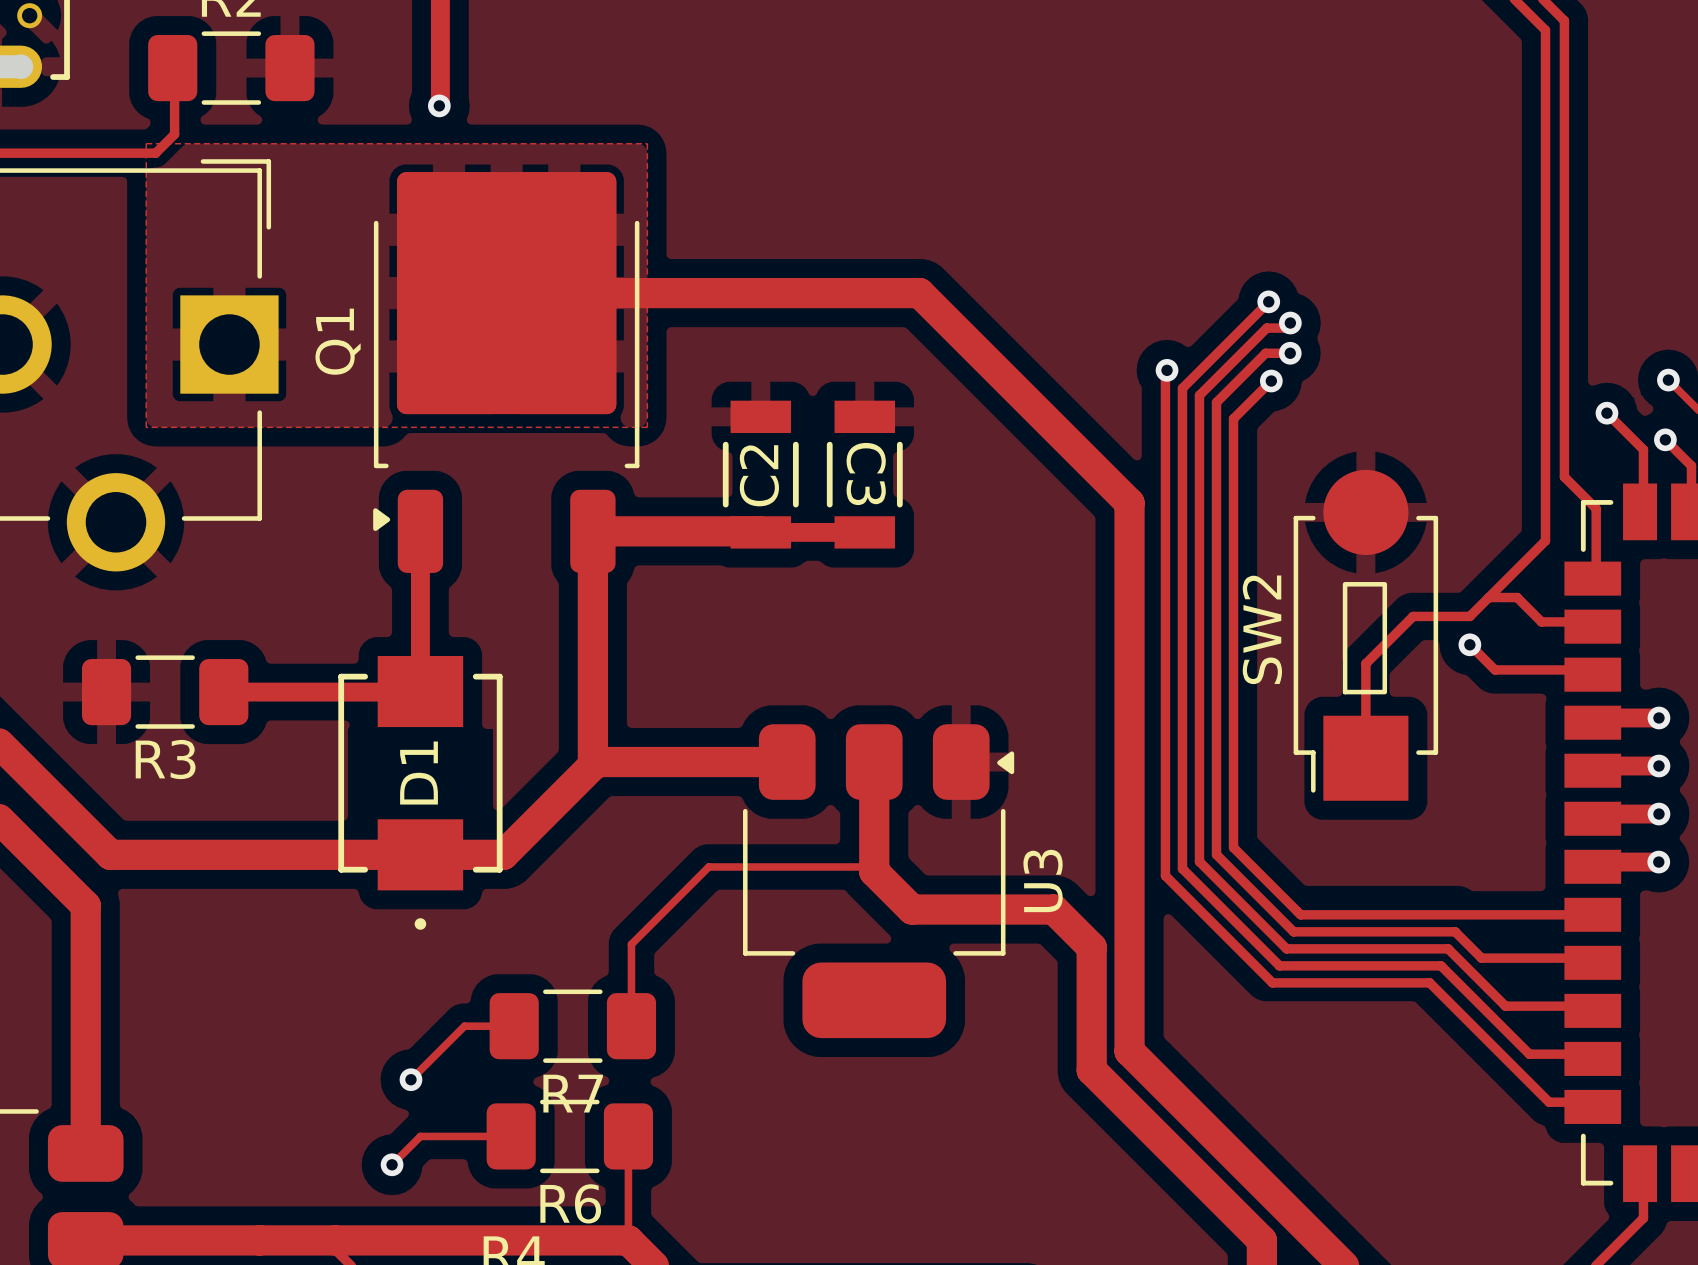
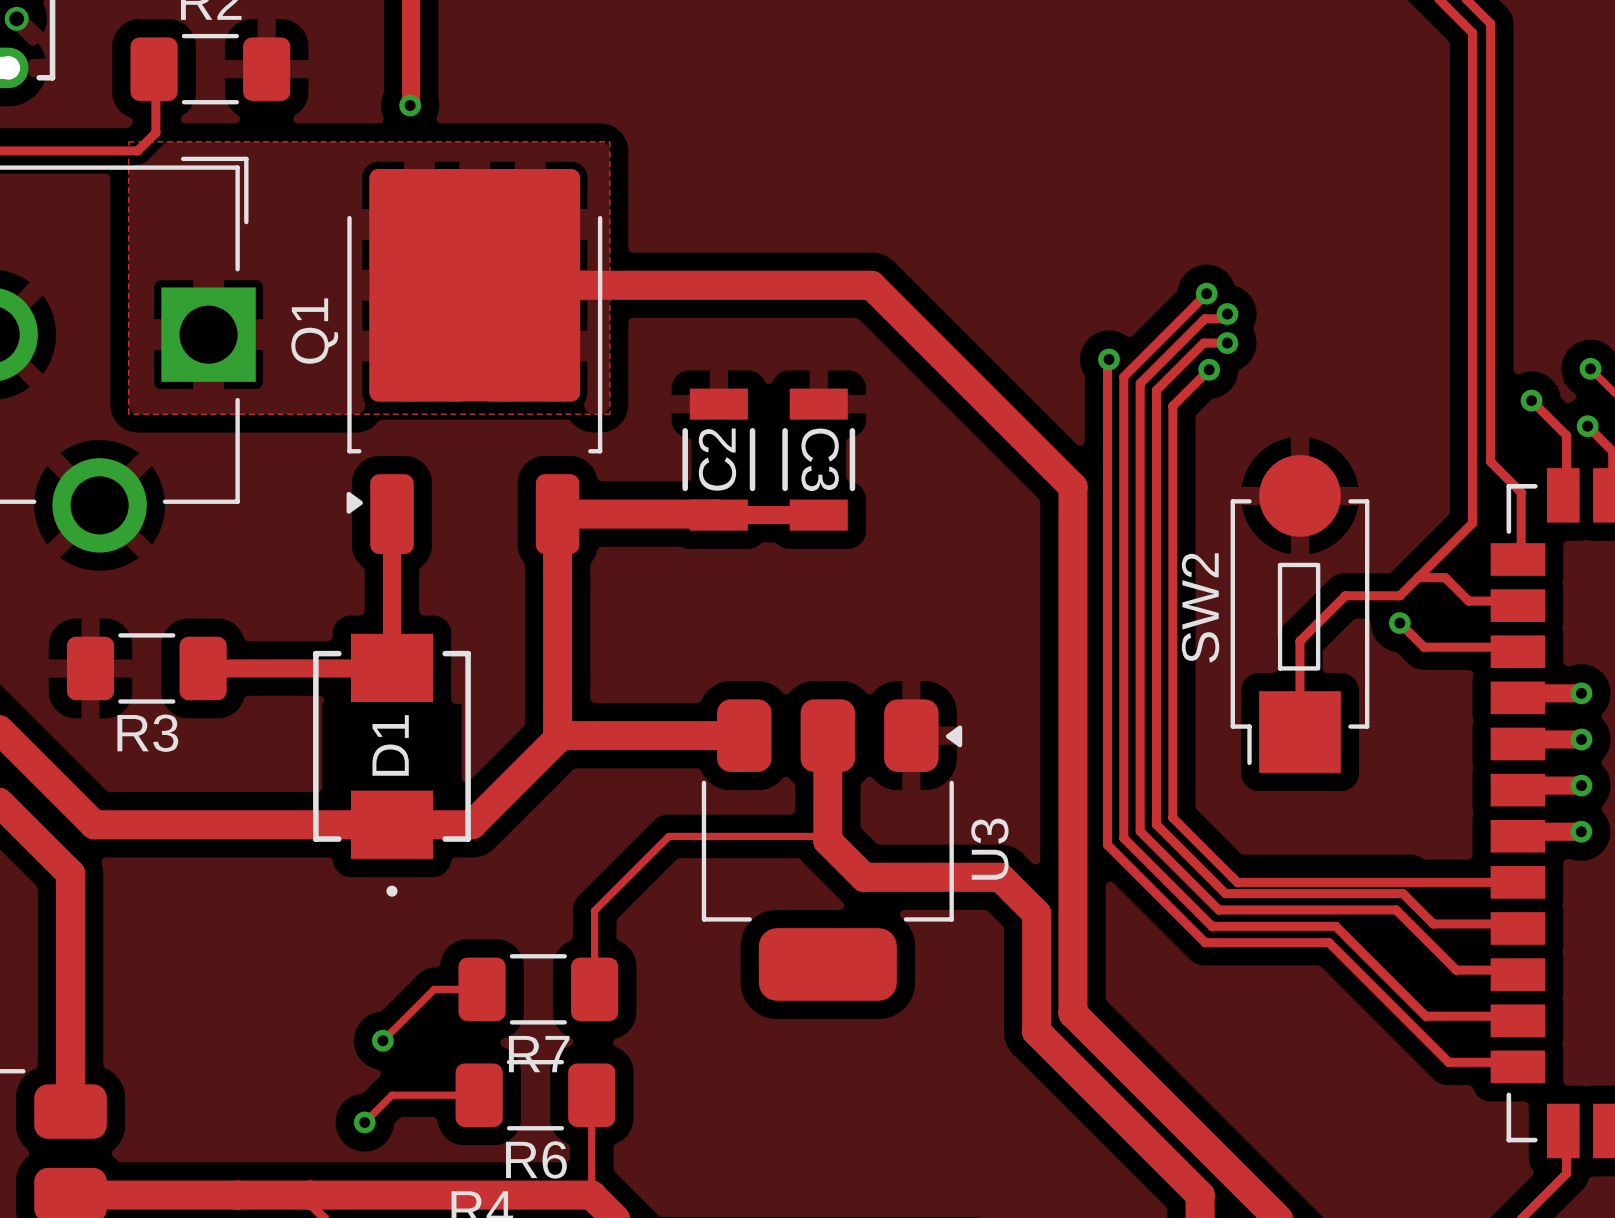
track: (1288, 926) (1293, 931) (1455, 931) (1481, 958) (1504, 958) -> (1225, 893) (1403, 893) (1433, 923)
track: (1281, 943) (1286, 948) (1448, 948) (1505, 1006) (1528, 1006) -> (1218, 909) (1396, 909) (1456, 970)
track: (1274, 960) (1279, 965) (1441, 965) (1529, 1054) -> (1211, 926) (1335, 926) (1425, 1016) (1457, 1016)
track: (1267, 977) (1272, 982) (1429, 982) (1549, 1102) -> (1205, 942) (1329, 942) (1448, 1062) (1475, 1062)

